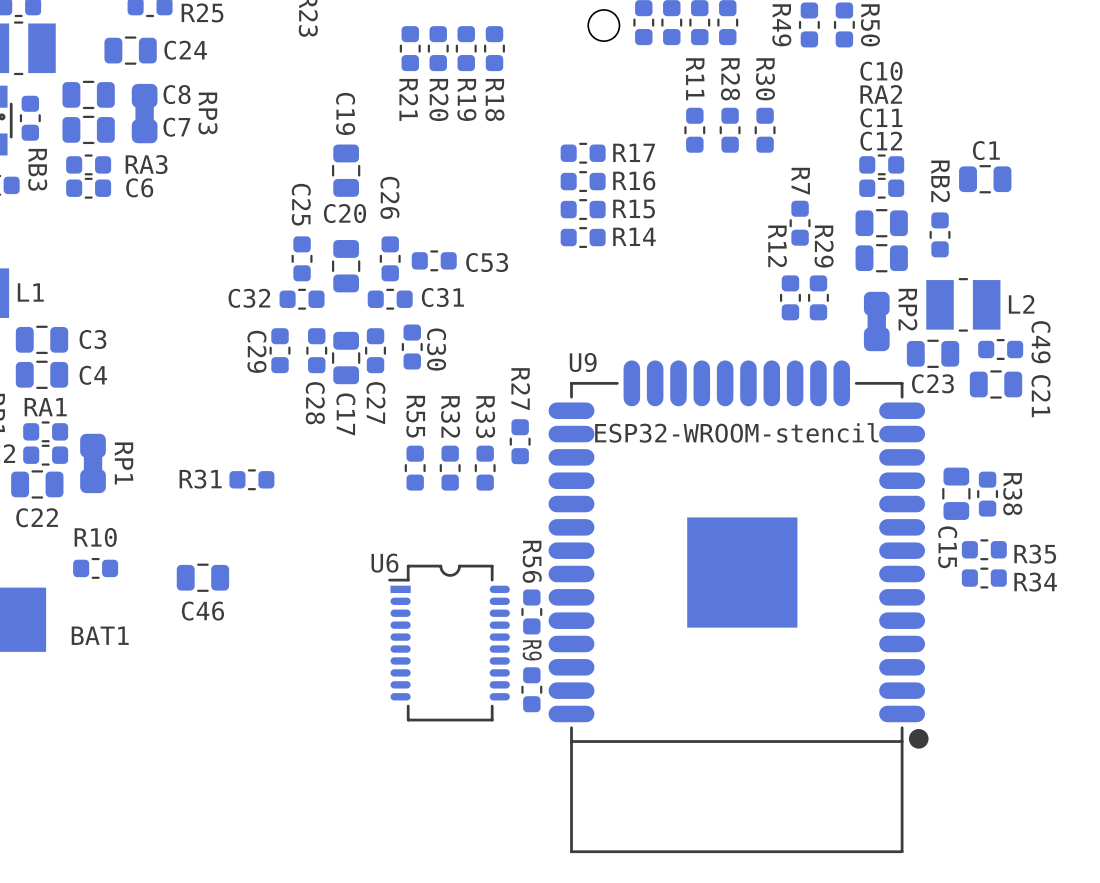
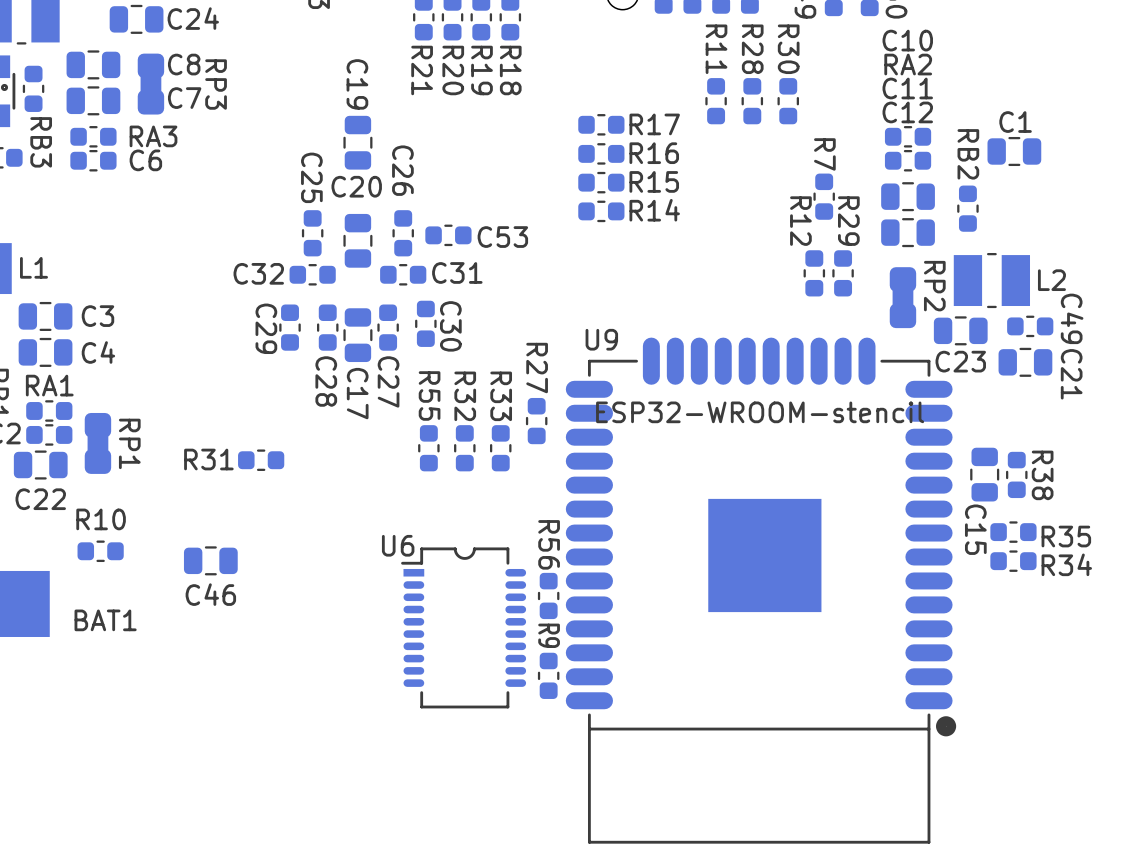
RP3 footprint: [131, 83, 158, 144] -> [137, 53, 165, 115]
RP2 footprint: [863, 291, 890, 352] -> [889, 267, 917, 329]
RP1 footprint: [80, 433, 106, 494] -> [84, 412, 112, 474]

